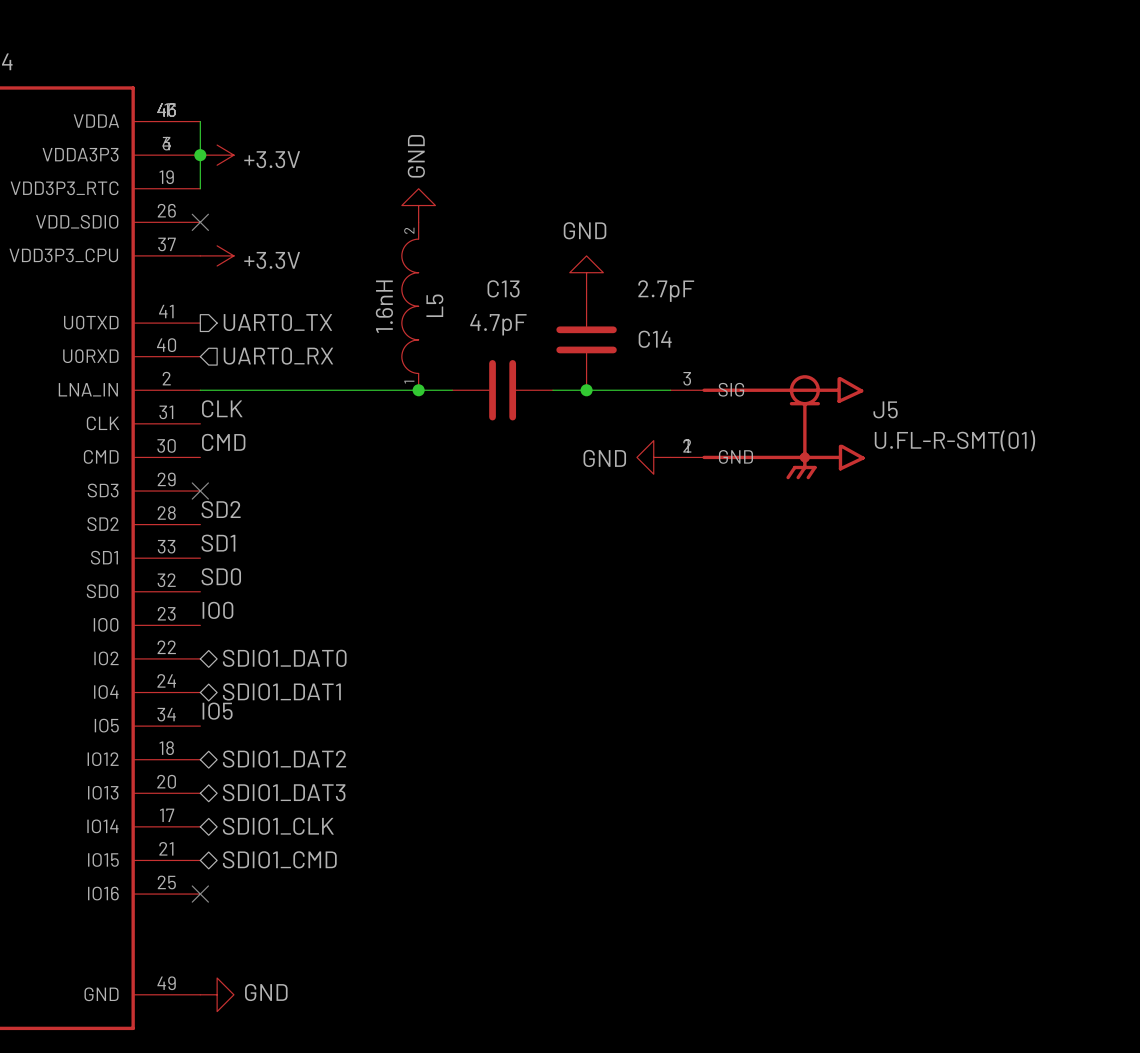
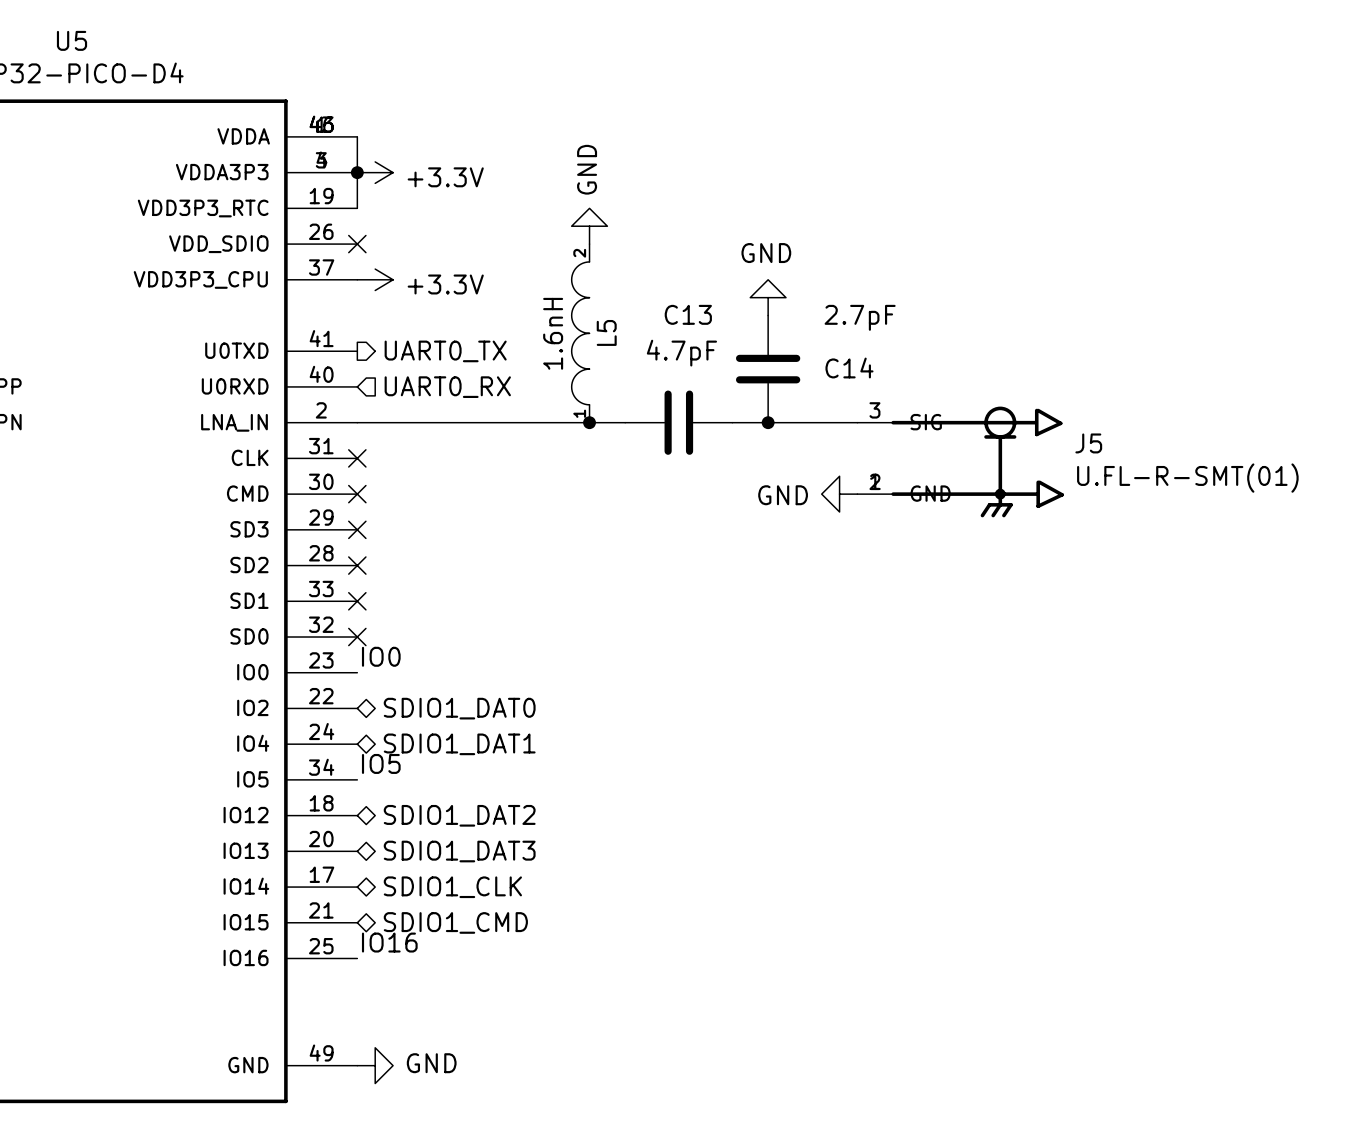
label: CLK (222, 408) -> none
no-connect mark: none -> (357, 458)
label: CMD (223, 442) -> none
no-connect mark: none -> (357, 494)
label: SD2 (221, 509) -> none
no-connect mark: none -> (357, 565)
label: SD1 (218, 543) -> none
no-connect mark: none -> (357, 601)
label: SD0 (221, 576) -> none
no-connect mark: none -> (357, 637)
label: none -> IO16 (389, 942)
no-connect mark: (200, 894) -> none

